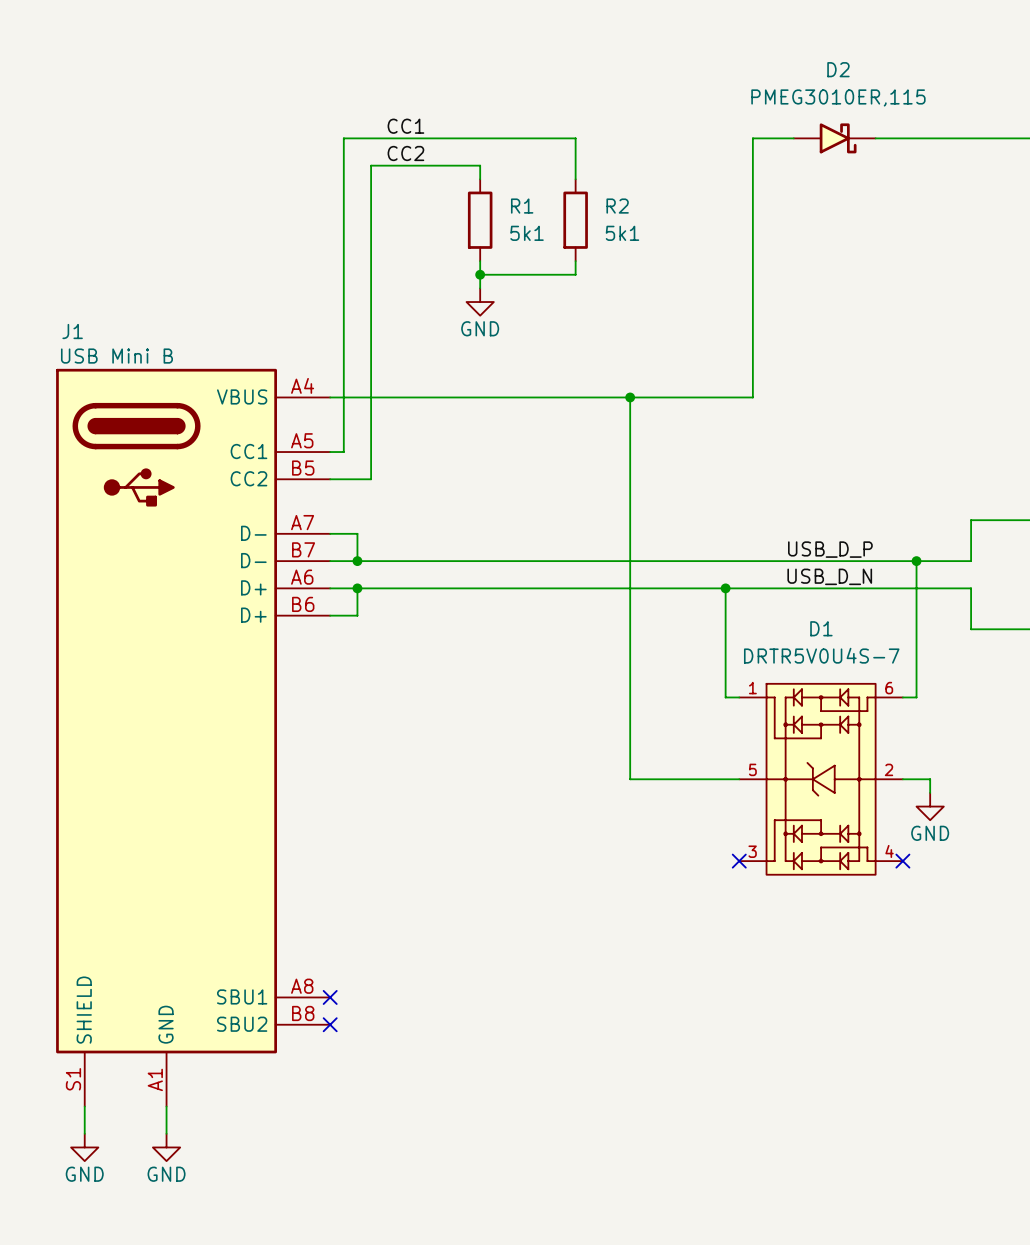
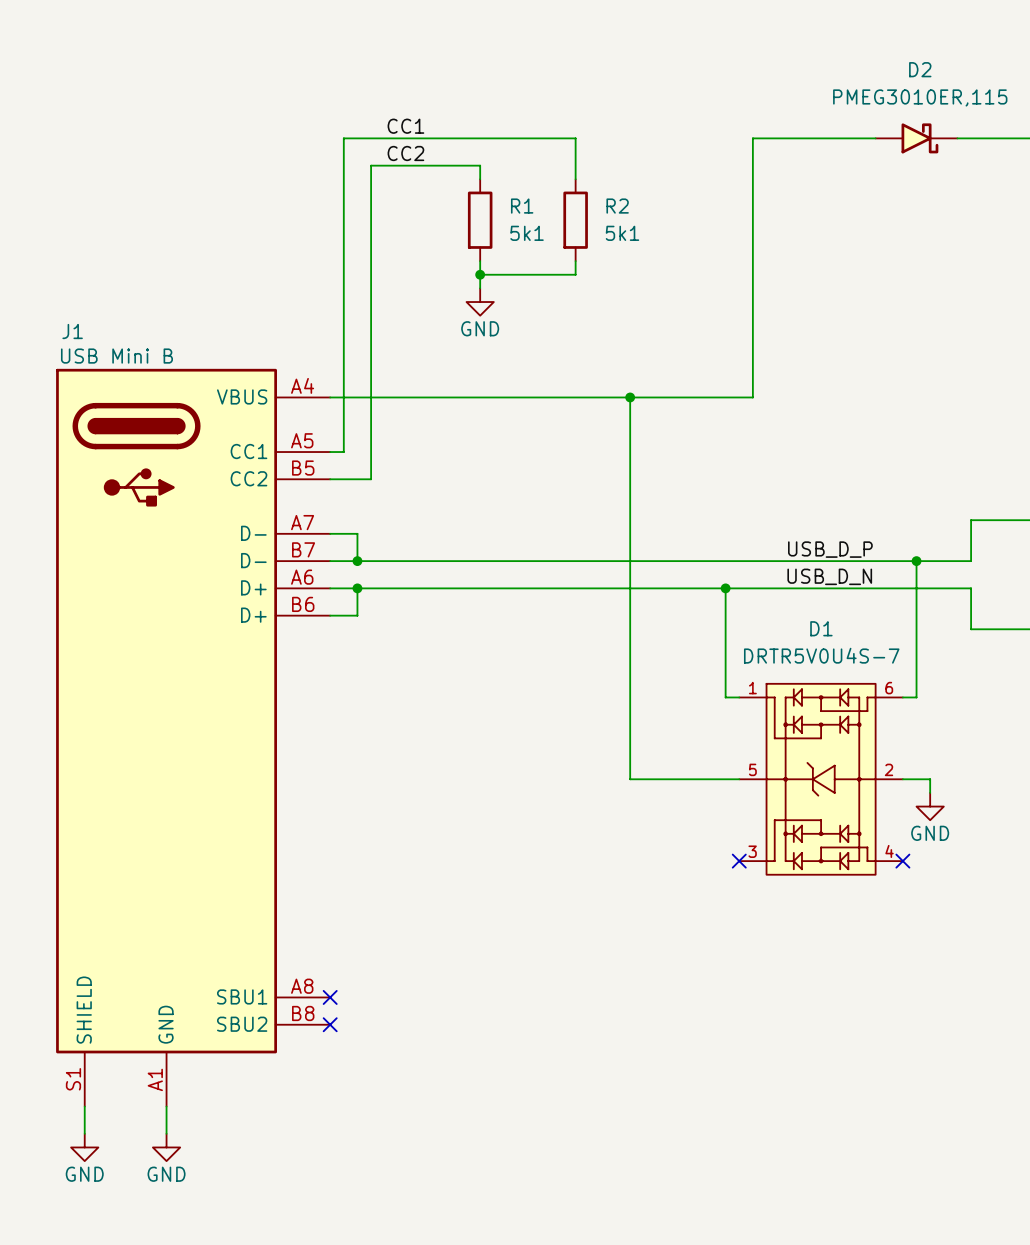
D2 position: (834, 138) -> (916, 138)

